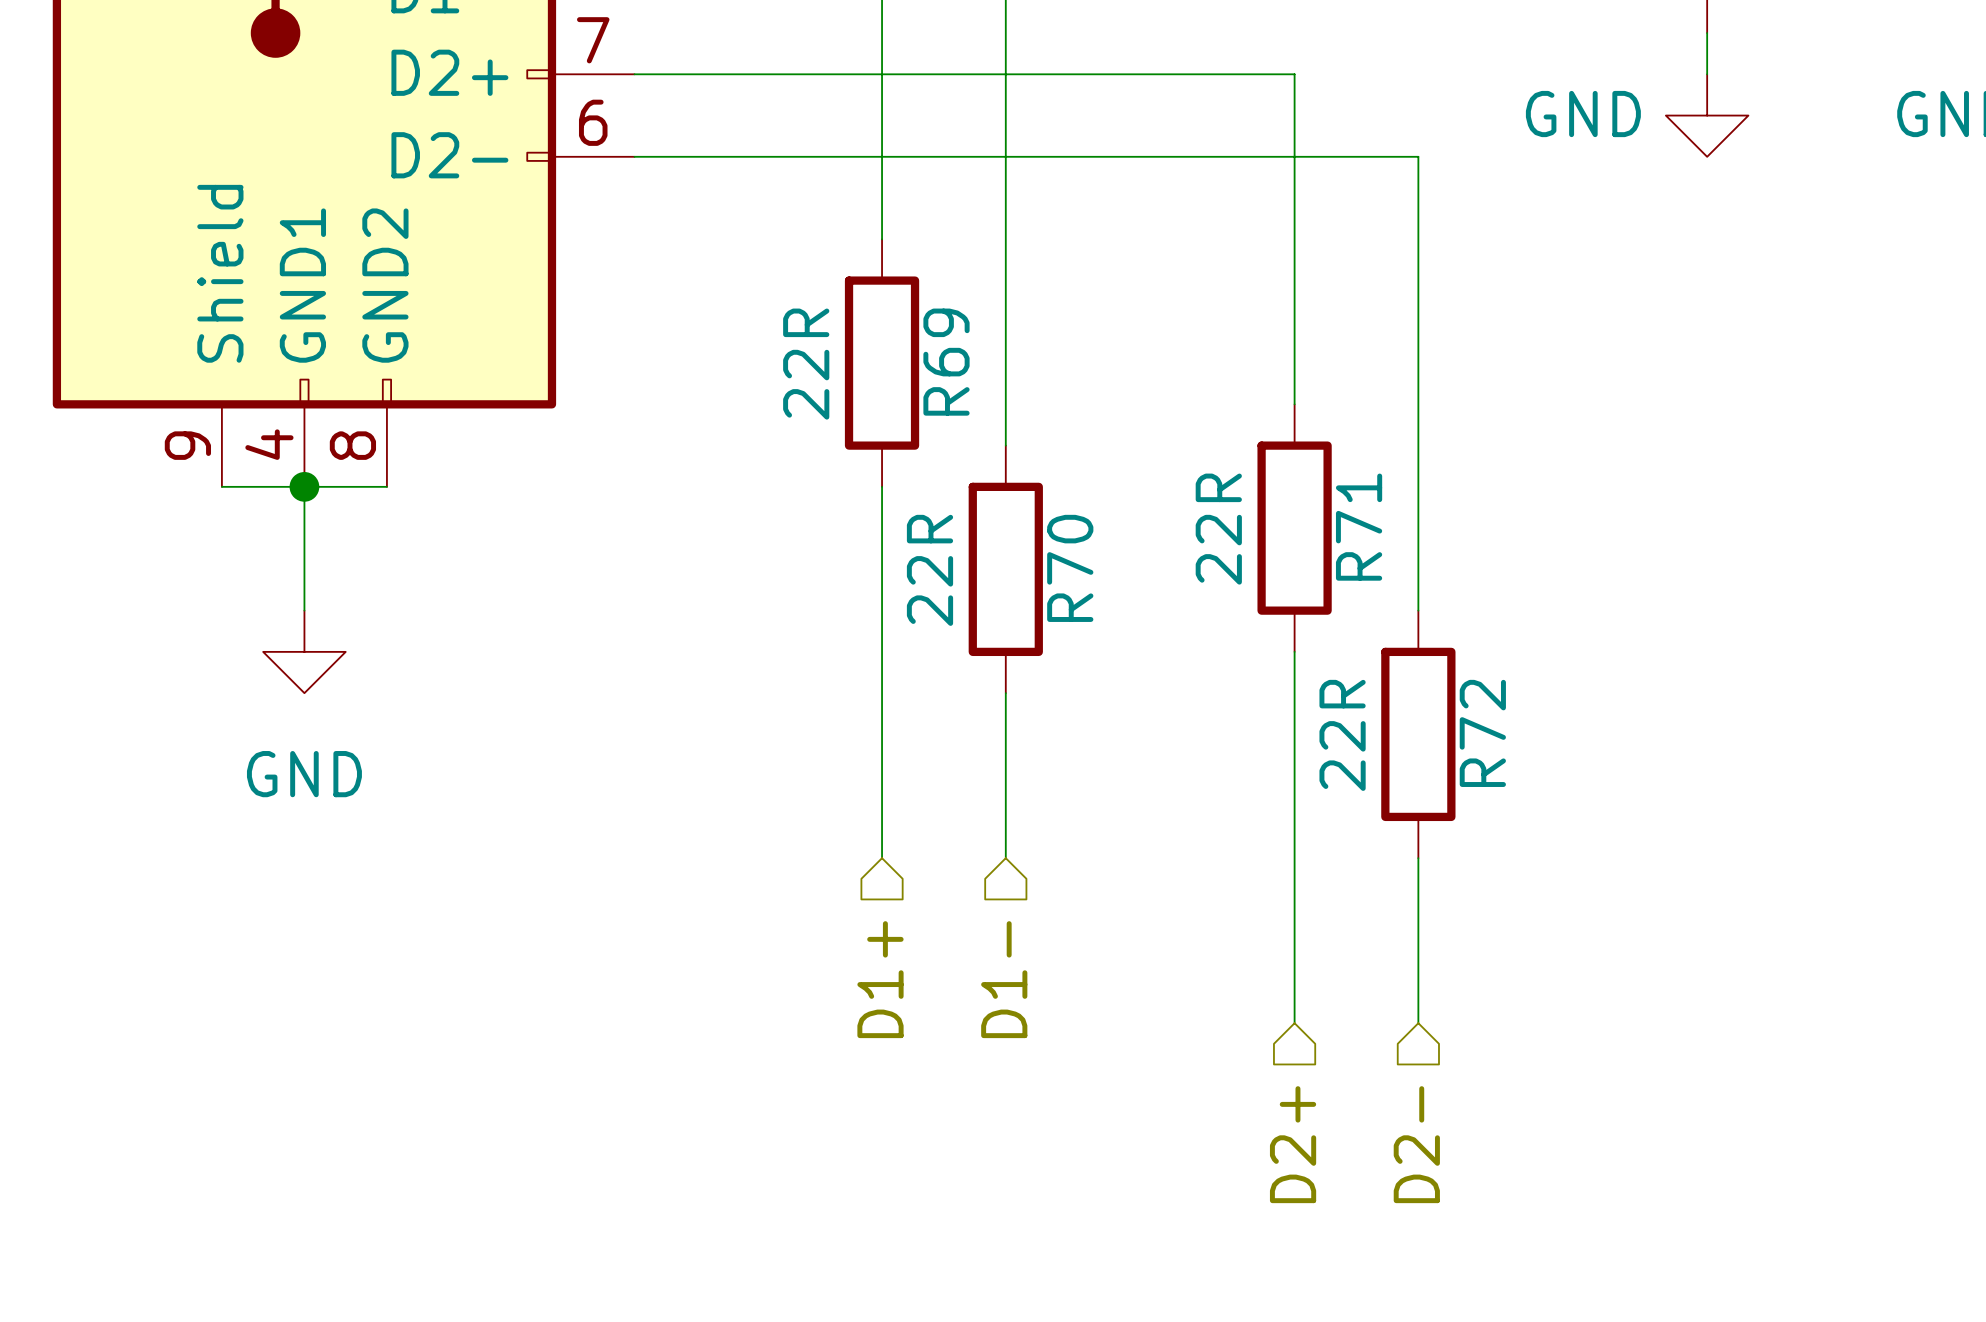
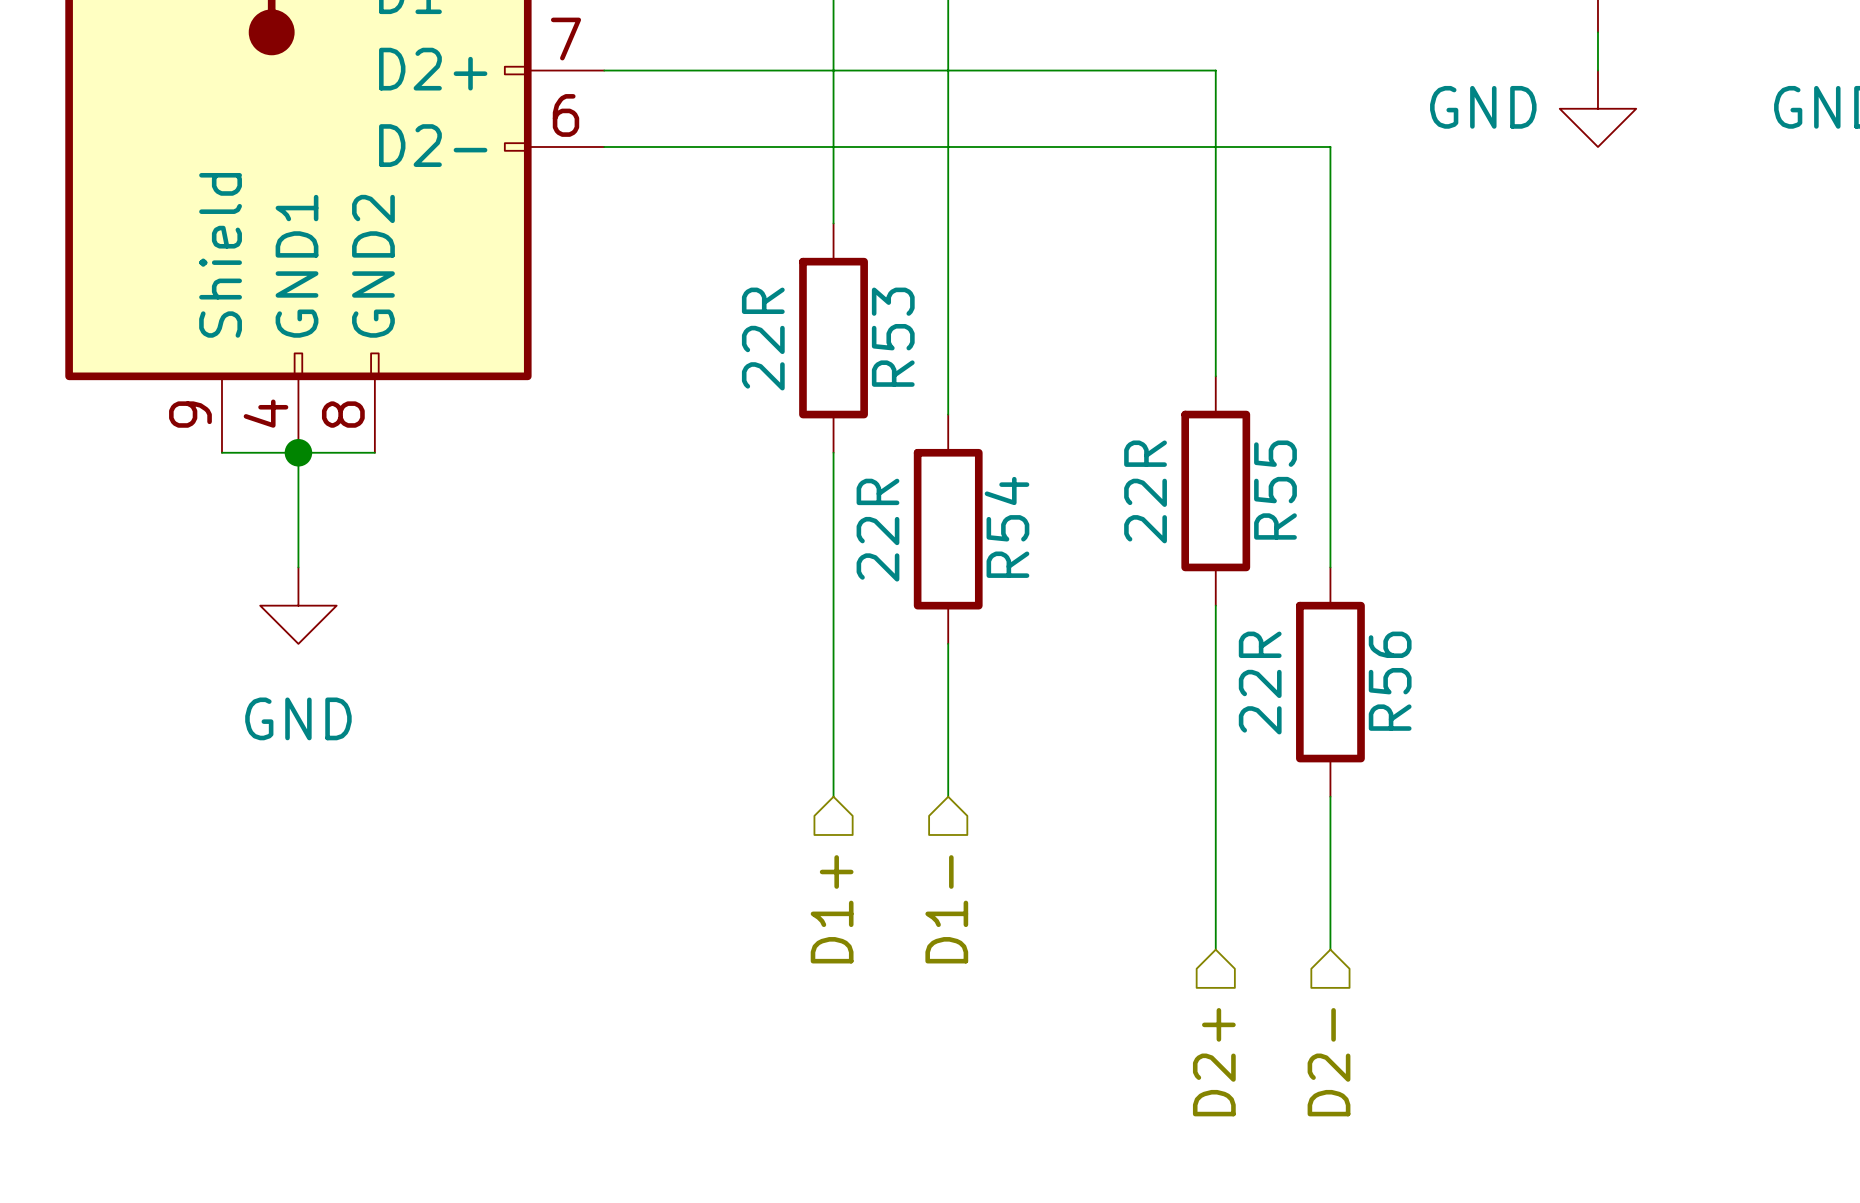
R69 name: R69 (946, 362) -> R53 (893, 337)
R71 name: R71 (1359, 527) -> R55 (1275, 490)
R70 name: R70 (1070, 568) -> R54 (1007, 527)
R72 name: R72 (1482, 733) -> R56 (1390, 681)

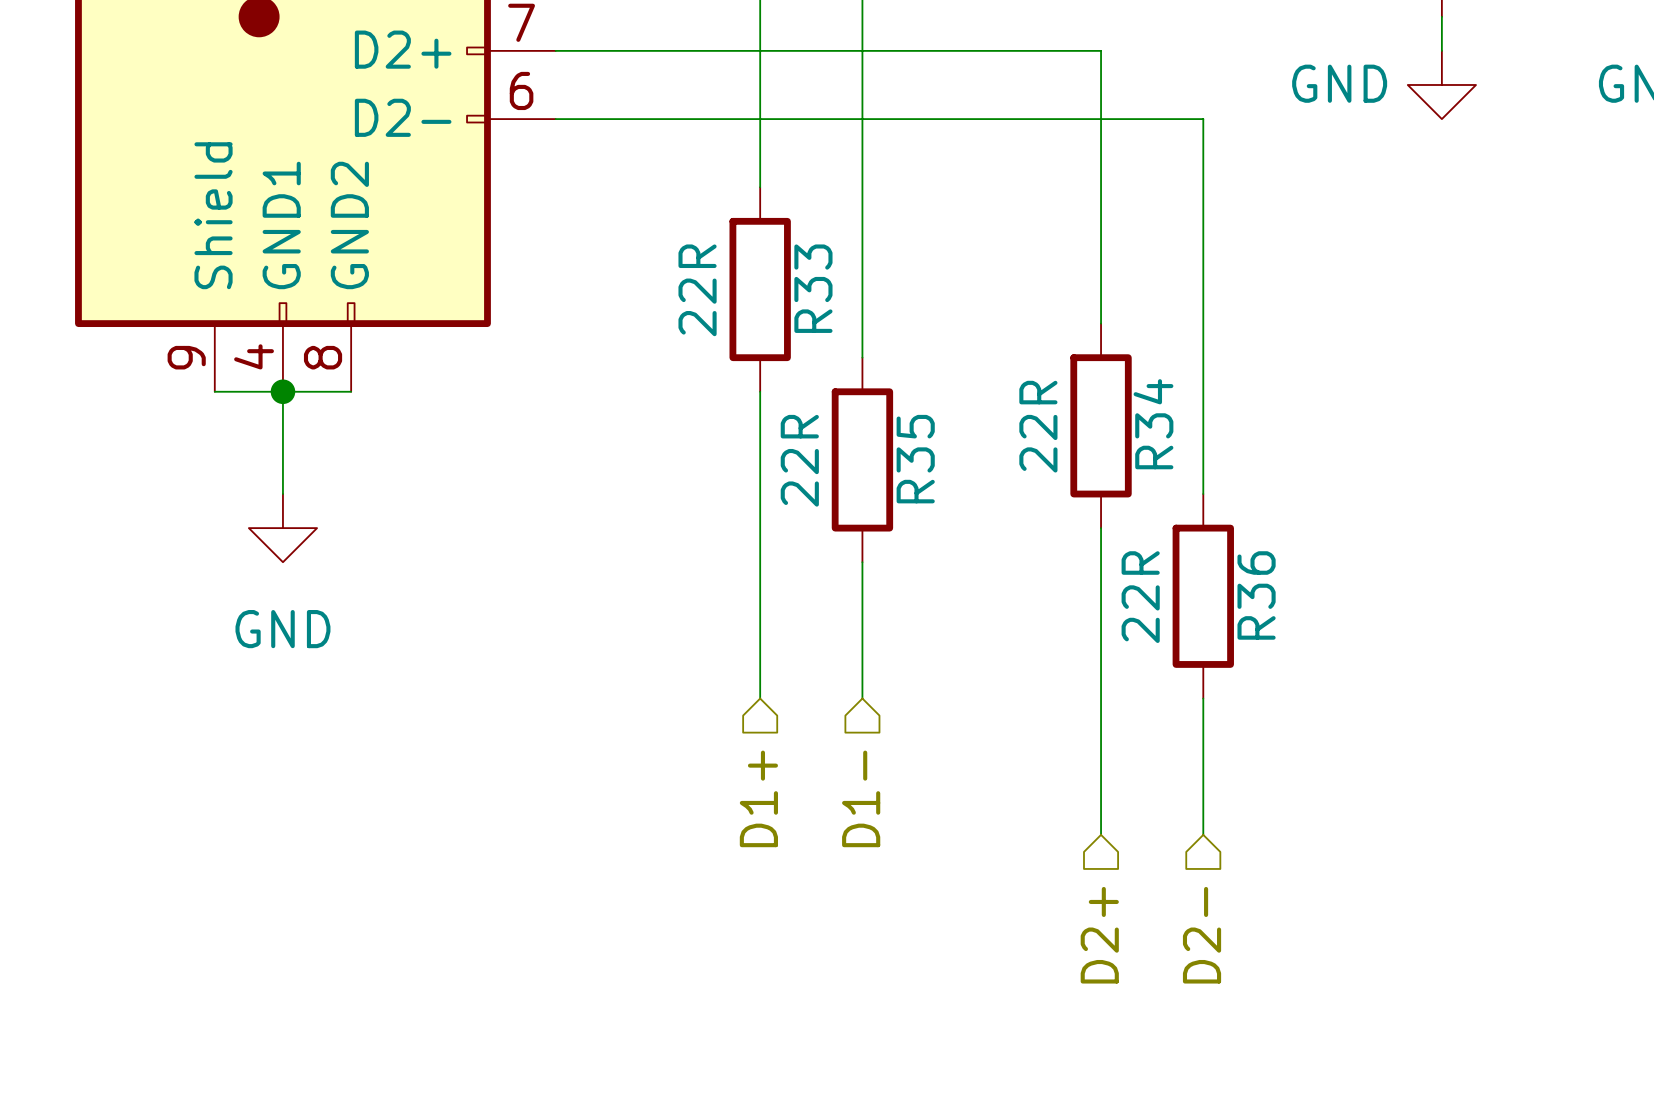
R53 name: R53 (893, 337) -> R33 (813, 288)
R55 name: R55 (1275, 490) -> R34 (1153, 424)
R54 name: R54 (1007, 527) -> R35 (915, 459)
R56 name: R56 (1390, 681) -> R36 (1256, 595)

